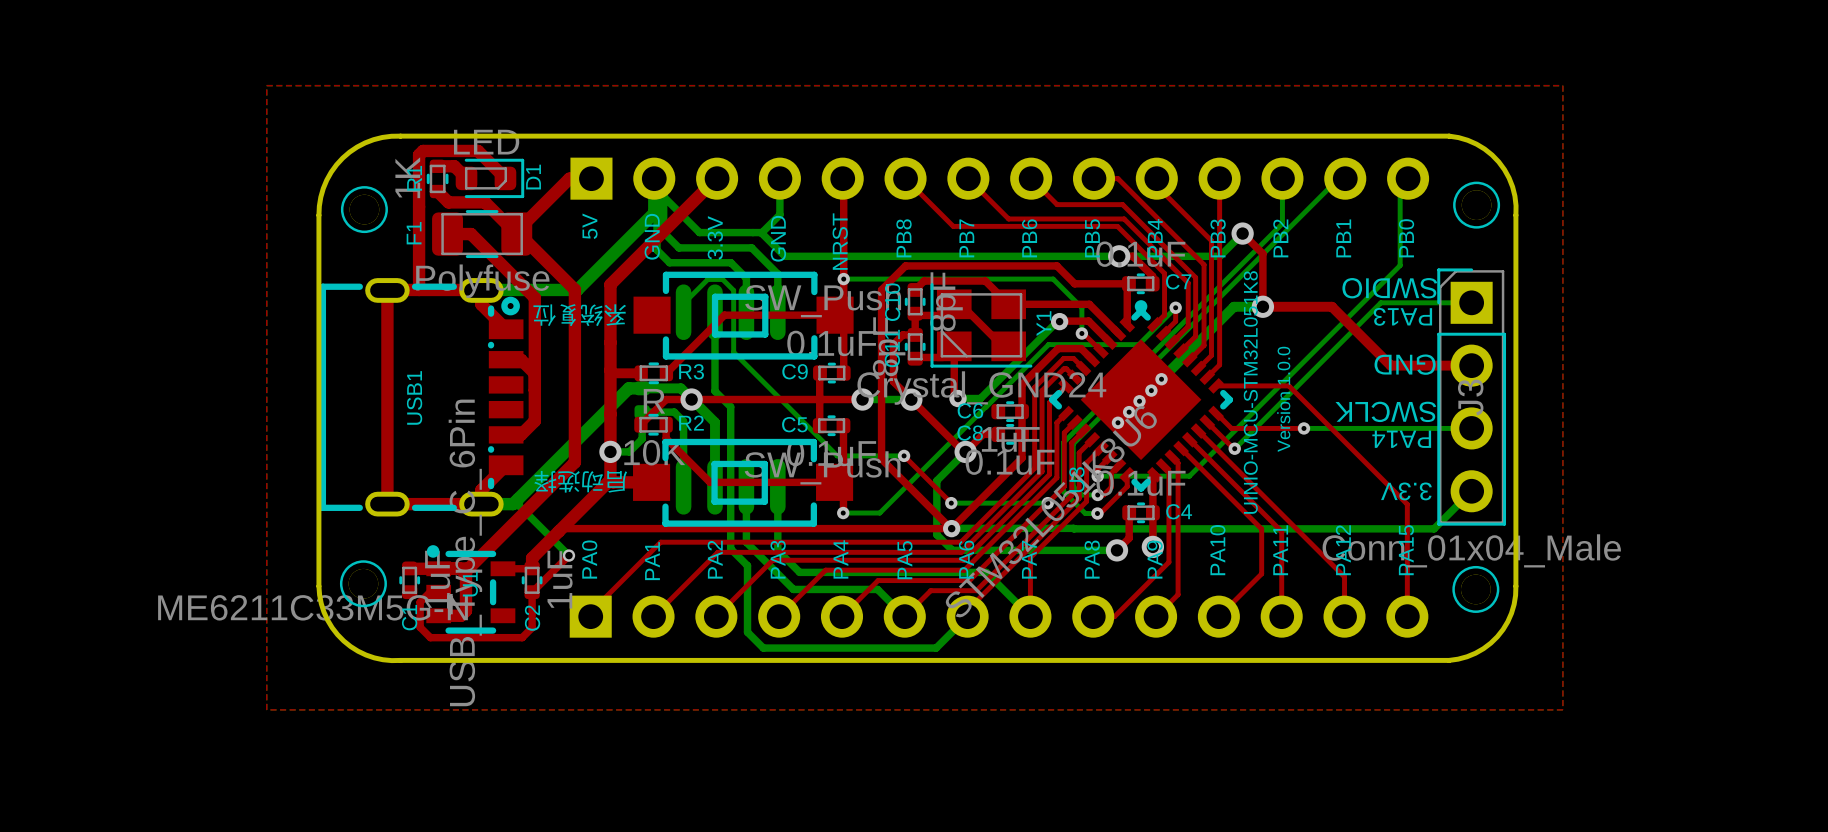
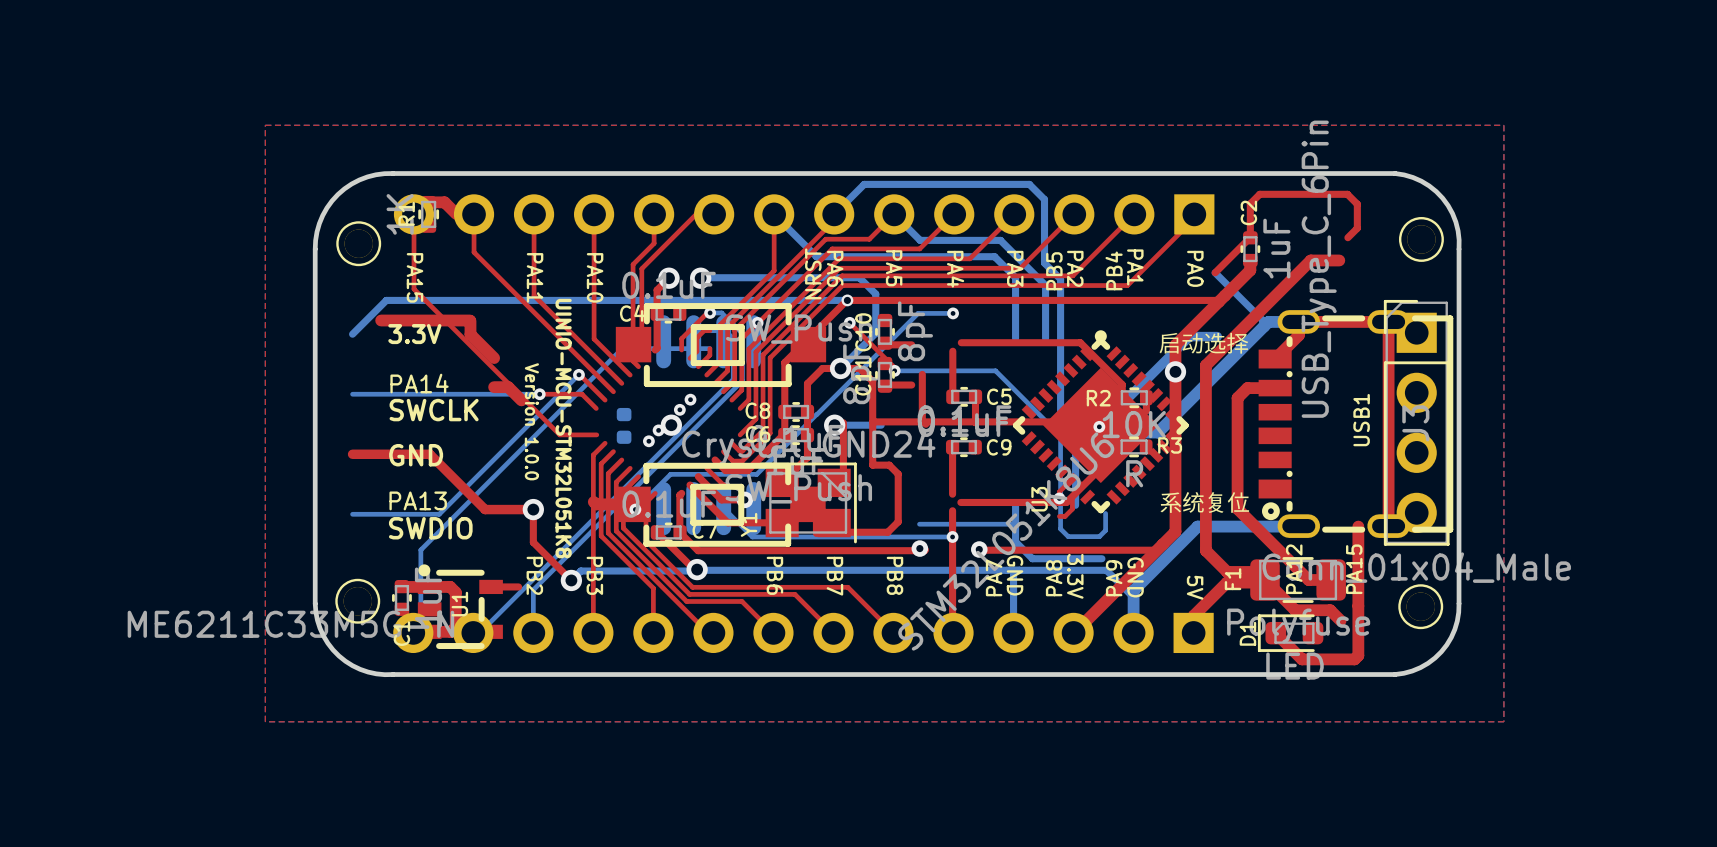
top track: none -> (414, 214) (414, 289) (559, 434) (596, 434)
top track: none -> (474, 214) (474, 252) (613, 391)
D1 rotation: 0° (489, 178) -> 180° (1290, 633)
D1 position: (489, 178) -> (1290, 633)
top track: (505, 178) (478, 150) (423, 150) (419, 154) (419, 289) -> none
top track: none -> (534, 214) (534, 295) (621, 383)
top track: (591, 178) (569, 178) (516, 231) -> none
top track: none -> (594, 214) (594, 338) (630, 375)
bottom track: (654, 178) (654, 213) (577, 289) (481, 289) -> none
top track: none -> (654, 214) (654, 243) (633, 264) (633, 361) (638, 366)
top track: (716, 178) (610, 284) (610, 479) (532, 558) (532, 568) -> none
top track: none -> (714, 214) (696, 214) (641, 268) (641, 353) (646, 358)
bottom track: (779, 178) (779, 214) (762, 232) -> none
top track: none -> (774, 214) (774, 270) (720, 324) (720, 361) (706, 375)
bottom track: none -> (774, 214) (816, 256) (994, 256) (1015, 277) (1015, 338)
bottom track: none -> (834, 214) (864, 184) (1029, 184) (1044, 199) (1044, 263) (1060, 279) (1060, 414) (1075, 429) (1075, 505)
top track: (905, 178) (953, 226) (1117, 226) (1164, 273) (1164, 315) (1154, 324) -> none
top track: none -> (894, 214) (869, 239) (825, 239) (734, 330) (734, 380) (723, 391)
bottom track: none -> (894, 214) (920, 240) (1000, 240) (1045, 285) (1045, 338)
top track: (968, 178) (1008, 218) (1124, 218) (1188, 283) (1188, 326) (1172, 342) -> none
top track: none -> (954, 214) (919, 248) (832, 248) (741, 338) (741, 390) (731, 400)
part rotation: 0° (999, 178) -> 180° (804, 214)
top track: (1031, 178) (1057, 204) (1122, 204) (1195, 277) (1195, 336) (1181, 350) -> none
top track: none -> (1014, 214) (969, 258) (839, 258) (748, 349) (748, 399) (740, 408)
top track: (1094, 178) (1117, 178) (1204, 264) (1204, 345) (1189, 359) -> none
top track: none -> (1074, 214) (1020, 268) (839, 268) (755, 352) (755, 419) (740, 434)
top track: none -> (1134, 214) (1072, 275) (842, 275) (763, 354) (763, 430) (742, 451) (739, 451) (731, 443)
top track: (1219, 178) (1219, 364) (1207, 377) -> none
bottom track: (1282, 178) (1282, 223) (1063, 442) (1063, 491) (1085, 513) (1097, 513) -> none
bottom track: (1345, 178) (1338, 178) (1073, 444) (1073, 486) (1081, 494) (1097, 494) -> none
bottom track: (1400, 178) (1400, 265) (1189, 476) (1097, 476) -> none
top track: (843, 179) (843, 306) -> (952, 510) (952, 631)
bottom track: (657, 181) (657, 250) (669, 262) (730, 262) (746, 278) (746, 312) -> none
top track: none -> (1194, 218) (1127, 285) (842, 285) (770, 357) (770, 433) (742, 461) (732, 461) (723, 451)
top track: none -> (834, 220) (727, 327) (727, 370) (715, 383)
top track: (1156, 186) (1211, 240) (1211, 355) (1198, 368) -> none
bottom track: (654, 187) (699, 232) (762, 232) -> none
bottom track: (663, 188) (663, 232) (679, 247) (751, 247) (777, 274) (777, 312) -> none
top track: (437, 191) (448, 202) (485, 202) (516, 234) -> none
top track: none -> (1250, 237) (1215, 272)
top track: none -> (1250, 237) (1250, 203) (1259, 194) (1347, 194) (1357, 204) (1357, 228) (1347, 237)
text: 5V (590, 226) -> none
top track: none -> (1250, 260) (1250, 270) (1175, 345) (1175, 531) (1074, 632)
top track: none -> (1339, 260) (1310, 260) (1205, 365) (1205, 550) (1227, 571) (1254, 571) (1262, 579)
bottom track: (762, 232) (784, 256) (1219, 256) (1242, 233) -> none
top track: (1242, 233) (1262, 253) (1262, 306) (1331, 306) (1390, 365) (1471, 365) -> none
via: (1242, 233) -> none
top track: (447, 234) (471, 234) (534, 297) (534, 421) (520, 434) (506, 434) -> none
F1 position: (482, 234) -> (1298, 579)
top track: (519, 234) (574, 289) (574, 462) (468, 568) (439, 568) -> none
text: GND (652, 236) -> none
text: none -> PA0 (1195, 268)
text: 3.3V (715, 237) -> none
text: GND (778, 238) -> none
text rotation: 0° (904, 238) -> 180° (894, 575)
text position: PB8 (904, 238) -> PB8 (894, 575)
text rotation: 0° (966, 238) -> 180° (834, 576)
text position: PB7 (966, 238) -> PB7 (834, 576)
text rotation: 0° (1029, 238) -> 180° (774, 575)
text position: PB6 (1029, 238) -> PB6 (774, 575)
text: PB3 (1218, 238) -> none
text: PB2 (1280, 238) -> none
text: PB1 (1343, 238) -> none
text: PB0 (1406, 238) -> none
bottom track: none -> (1215, 272) (1263, 321) (1263, 326)
text: none -> PA15 (415, 277)
text: none -> PA11 (535, 277)
text: none -> PA10 (595, 277)
top track: none -> (668, 278) (657, 290) (657, 348) (655, 350)
via: none -> (668, 278)
bottom track: none -> (700, 278) (859, 277) (875, 294) (875, 333) (840, 368)
via: none -> (700, 278)
top track: (1119, 256) (1132, 256) (1152, 276) (1152, 283) -> none
via: (1119, 256) -> none
bottom track: none -> (847, 300) (386, 300) (352, 334)
via: none -> (847, 300)
top track: none -> (1218, 301) (846, 300) (784, 362) (784, 435)
bottom track: (843, 279) (1053, 279) (1081, 307) (1081, 333) -> none
via: (843, 279) -> none
top track: none -> (710, 312) (707, 312) (681, 338) (681, 350)
bottom track: none -> (710, 312) (721, 312) (742, 333) (742, 380) (533, 589) (533, 632)
via: none -> (710, 312)
bottom track: none -> (953, 313) (918, 313) (816, 414)
via: none -> (953, 313)
top track: (1128, 283) (1074, 283) (1056, 265) (905, 265) (881, 289) (881, 459) (951, 528) -> none
C7 position: (1140, 283) -> (668, 532)
top track: (1127, 285) (1127, 324) -> none
text: SWDIO (1389, 288) -> none
top track: (915, 289) (924, 281) (985, 281) (1008, 304) (1089, 304) (1118, 333) -> none
top track: (387, 290) (387, 504) (481, 504) (481, 490) (506, 465) -> none
bottom track: none -> (1298, 321) (1268, 321) (1157, 432) (1108, 432) (1097, 421)
via: none -> (757, 322)
top track: none -> (849, 322) (894, 367) (894, 370)
via: none -> (849, 322)
top track: none -> (709, 330) (704, 330) (696, 338) (696, 351) (690, 358)
bottom track: none -> (709, 330) (725, 330) (733, 338) (733, 379) (479, 632)
bottom track: (1471, 302) (1380, 302) (1234, 448) -> none
bottom track: (683, 303) (707, 279) (722, 279) (733, 290) (733, 352) (837, 455) (904, 455) -> none
text: none -> 3.3V (414, 334)
top track: (960, 304) (1002, 346) -> none
via: (1262, 306) -> none
top track: (1175, 307) (1175, 321) (1163, 333) -> none
bottom track: (1175, 307) (1138, 344) (1048, 344) (986, 407) -> none
via: (1175, 307) -> none
bottom track: (714, 312) (714, 391) (730, 406) (730, 548) (747, 565) (747, 632) (763, 648) (936, 648) (967, 616) -> none
top track: (915, 313) (915, 334) (902, 334) (893, 344) (893, 381) (963, 451) (983, 434) (998, 434) -> none
top track: none -> (961, 342) (1080, 342) (1122, 384) (1122, 397)
text: none -> 启动选择 (1203, 343)
text: 系统复位 (579, 315) -> none
top track: (835, 315) (724, 315) (666, 373) -> none
text: PA13 (1402, 316) -> none
top track: none -> (709, 348) (709, 355) (698, 366)
bottom track: none -> (709, 348) (622, 348) (420, 549) (420, 632)
top track: (1059, 321) (1088, 321) (1109, 342) -> none
bottom track: (1059, 321) (1057, 321) (980, 398) (957, 398) -> none
via: (1059, 321) -> none
top track: (843, 323) (843, 373) -> (952, 447) (952, 494)
Y1 rotation: 0° (981, 325) -> 180° (808, 502)
Y1 position: (981, 325) -> (808, 502)
top track: none -> (1275, 359) (1298, 335) (1298, 321) (1388, 321) (1388, 526)
top track: (1081, 333) (1101, 350) -> none
via: (1081, 333) -> none
bottom track: none -> (894, 370) (995, 370) (1060, 435) (1060, 528) (1068, 536) (1099, 536) (1105, 530) (1105, 513)
via: none -> (894, 370)
via: none -> (1175, 371)
top track: none -> (578, 374) (605, 400)
bottom track: none -> (578, 374) (439, 514) (352, 514)
via: none -> (578, 374)
text: none -> PA14 (419, 383)
top track: (1092, 359) (1081, 348) (1058, 348) (1022, 384) (1022, 458) (951, 528) -> none
top track: none -> (1275, 388) (1247, 388) (1237, 398) (1237, 508) (1308, 579) (1331, 579)
text: GND (1405, 364) -> none
bottom track: none -> (352, 394) (539, 394)
top track: none -> (539, 394) (582, 394) (596, 408)
via: none -> (539, 394)
top track: (1083, 368) (1073, 358) (1063, 358) (1034, 387) (1034, 468) (960, 542) (660, 542) (590, 612) -> none
top track: none -> (975, 396) (976, 423)
top track: (610, 370) (613, 373) (641, 373) -> none
top track: none -> (1146, 397) (1146, 410) (1135, 421) (872, 421)
C9 name position: C9 (795, 371) -> C9 (999, 447)
via: none -> (690, 399)
R3 position: (653, 373) -> (1134, 446)
top track: (819, 373) (819, 397) (817, 399) -> none
C9 position: (831, 373) -> (963, 447)
top track: (1074, 377) (1066, 368) (1063, 368) (1042, 390) (1042, 471) (961, 552) (717, 552) (653, 616) -> none
via: (1161, 379) -> none
text: none -> SWCLK (434, 410)
via: none -> (679, 409)
top track: (1066, 385) (1049, 402) (1049, 474) (963, 560) (772, 560) (716, 616) -> none
top track: (1216, 385) (1288, 385) (1407, 504) (1407, 616) -> none
bottom track: none -> (816, 414) (756, 474) (670, 474) (635, 509)
via: (1151, 390) -> none
text: UINIO-MCU-STM32L051K8 (1250, 392) -> none
text: none -> Version 1.0.0 (531, 421)
USB1 rotation: 0° (421, 397) -> 180° (1355, 424)
USB1 position: (421, 397) -> (1355, 424)
top track: none -> (843, 422) (843, 473)
top track: (818, 398) (819, 425) -> none
via: (957, 398) -> none
top track: (862, 399) (666, 399) (640, 424) -> none
via position: (911, 399) -> (840, 368)
text: Version 1.0.0 (1283, 399) -> none
text: none -> UINIO-MCU-STM32L051K8 (563, 428)
via: none -> (658, 430)
bottom track: (985, 407) (879, 513) (843, 513) -> none
top track: none -> (783, 435) (747, 470) (725, 470) (715, 459)
C6 position: (1010, 411) -> (796, 435)
text: SWCLK (1385, 411) -> none
via: (1129, 412) -> none
top track: (1066, 413) (1056, 422) (1056, 477) (964, 570) (825, 570) (779, 616) -> none
top track: (1216, 413) (1231, 428) (1302, 428) -> none
via: none -> (648, 441)
top track: none -> (605, 443) (593, 454) (593, 632)
top track: (1074, 422) (1064, 432) (1064, 486) (969, 580) (878, 580) (841, 616) -> none
via: (1117, 422) -> none
top track: none -> (1122, 446) (1066, 502) (960, 502)
top track: (1207, 422) (1234, 448) -> none
R2 name position: R2 (691, 423) -> R2 (1098, 398)
R2 position: (653, 424) -> (1134, 397)
top track: (666, 424) (666, 438) (710, 482) (834, 482) -> none
C5 name position: C5 (794, 424) -> C5 (999, 396)
C5 position: (831, 425) -> (964, 396)
top track: (843, 425) (843, 473) -> (952, 351) (952, 396)
top track: none -> (613, 451) (601, 463) (601, 535) (653, 588) (653, 625)
bottom track: (1302, 428) (1471, 428) -> none
via: (1303, 428) -> none
top track: none -> (352, 454) (429, 454) (485, 509) (533, 509) (533, 542) (571, 580)
text: none -> GND (416, 455)
top track: (1083, 431) (1071, 442) (1071, 495) (976, 590) (930, 590) (904, 616) -> none
top track: (1198, 431) (1344, 576) (1344, 616) -> none
C8 position: (1010, 434) -> (796, 411)
top track: none -> (621, 459) (608, 473) (608, 533) (708, 632)
top track: (1092, 439) (1079, 452) (1079, 498) (967, 609) -> none
top track: (1189, 439) (1281, 531) (1281, 616) -> none
text: PA14 (1401, 439) -> none
top track: none -> (630, 468) (616, 482) (616, 531) (686, 601) (742, 601) (773, 632)
top track: none -> (706, 468) (725, 484)
top track: (1101, 448) (1086, 462) (1086, 501) (1030, 557) (1030, 616) -> none
top track: (1181, 448) (1261, 529) (1261, 573) (1218, 616) -> none
via: (1234, 448) -> none
bottom track: (610, 451) (629, 451) (642, 439) (642, 412) (674, 412) (683, 421) (683, 486) -> none
via: (610, 451) -> none
bottom track: (965, 451) (936, 480) (936, 534) (952, 550) (1117, 550) -> none
via: (965, 451) -> none
top track: none -> (638, 476) (623, 491) (623, 528) (689, 594) (794, 594) (833, 632)
top track: none -> (698, 476) (721, 499) (744, 499)
top track: (904, 455) (951, 503) -> none
via: (904, 455) -> none
top track: (1172, 457) (1178, 462) (1178, 594) (1156, 616) -> none
top track: none -> (782, 482) (807, 457) (807, 383) (822, 368) (859, 368) (872, 381) (872, 465) (889, 465) (898, 474) (898, 521) (887, 532) (843, 532)
top track: none -> (690, 485) (727, 522) (781, 522)
bottom track: none -> (725, 484) (725, 509) (752, 536) (952, 536)
top track: (1163, 466) (1168, 471) (1168, 562) (1114, 616) (1093, 616) -> none
top track: none -> (655, 493) (646, 502) (646, 540) (692, 587) (847, 587) (893, 632)
top track: none -> (681, 493) (679, 495) (679, 529)
top track: (1127, 474) (1127, 486) (1100, 513) (1097, 513) -> none
top track: (1154, 474) (1152, 476) (1152, 546) -> none
via: none -> (744, 499)
text: none -> PA13 (418, 500)
text: none -> 系统复位 (1204, 502)
text: 启动选择 (580, 481) -> none
bottom track: none -> (1015, 505) (1015, 541) (1032, 558) (1101, 558)
bottom track: (714, 486) (714, 422) (680, 388) (628, 388) (513, 504) (481, 504) -> none
bottom track: (746, 486) (746, 542) (793, 589) (877, 589) (904, 616) -> none
bottom track: (777, 486) (777, 550) (799, 572) (986, 572) (1030, 616) -> none
via: none -> (533, 509)
via: none -> (635, 509)
text: 3.3V (1406, 491) -> none
bottom track: (1471, 491) (1434, 528) (951, 528) -> none
via: (1097, 494) -> none
bottom track: (517, 499) (517, 504) (568, 555) -> none
via: (951, 503) -> none
via: (1047, 503) -> none
bottom track: none -> (1298, 526) (1197, 526) (1133, 590) (1133, 632)
top track: none -> (1358, 526) (1358, 655) (1354, 659) (1302, 659) (1275, 633)
text: none -> SWDIO (430, 528)
top track: none -> (657, 532) (694, 569) (697, 569)
top track: none -> (680, 532) (698, 550) (925, 549)
C4 name position: C4 (1179, 511) -> C4 (632, 313)
top track: (1129, 512) (1129, 538) (1117, 550) -> none
C4 position: (1141, 512) -> (668, 313)
via: (843, 513) -> none
via: (1097, 513) -> none
via: none -> (952, 536)
top track: none -> (1162, 544) (1157, 550) (979, 549)
top track: (951, 528) (561, 528) (558, 531) -> none
via: none -> (979, 549)
via: (1152, 546) -> none
via: none -> (697, 569)
via: (1117, 550) -> none
text: PA10 (1217, 550) -> none
text: PA11 (1280, 550) -> none
bottom track: none -> (1013, 570) (1013, 632)
top track: (568, 555) (532, 592) -> none
via: (568, 555) -> none
text: none -> GND (1015, 575)
text: none -> PB2 (534, 575)
text: none -> PB3 (594, 575)
text: none -> 3.3V (1075, 576)
text: none -> GND (1135, 577)
text: PA0 (589, 559) -> none
text rotation: 0° (715, 559) -> 180° (1075, 268)
text position: PA2 (715, 559) -> PA2 (1075, 268)
text rotation: 0° (778, 559) -> 180° (1015, 268)
text position: PA3 (778, 559) -> PA3 (1015, 268)
text rotation: 0° (840, 559) -> 180° (955, 269)
text position: PA4 (840, 559) -> PA4 (955, 269)
text rotation: 0° (966, 559) -> 180° (835, 268)
text position: PA6 (966, 559) -> PA6 (835, 268)
text rotation: 0° (905, 560) -> 180° (894, 268)
text position: PA5 (905, 560) -> PA5 (894, 268)
bottom track: none -> (571, 580) (580, 571) (1106, 570) (1133, 597) (1133, 624)
via: none -> (571, 580)
text rotation: 0° (652, 561) -> 180° (1135, 267)
text position: PA1 (652, 561) -> PA1 (1135, 267)
top track: none -> (1265, 579) (1295, 610) (1330, 610) (1340, 620)
top track: none -> (1265, 582) (1226, 582) (1193, 615) (1193, 632)
text: none -> 5V (1195, 587)
C2 position: (532, 580) -> (1250, 249)
top track: (430, 592) (420, 602) (420, 627) (430, 637) (522, 637) (532, 627) (532, 592) -> none
part rotation: 0° (999, 616) -> 180° (803, 632)
C2 name position: C2 (532, 618) -> C2 (1248, 212)

